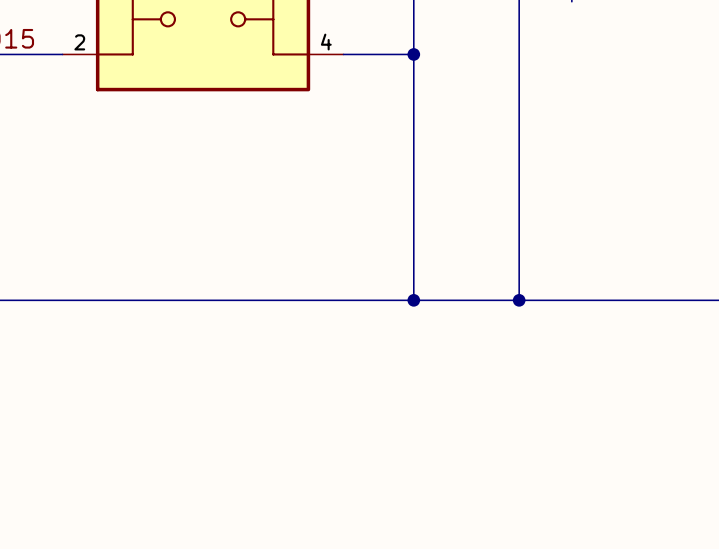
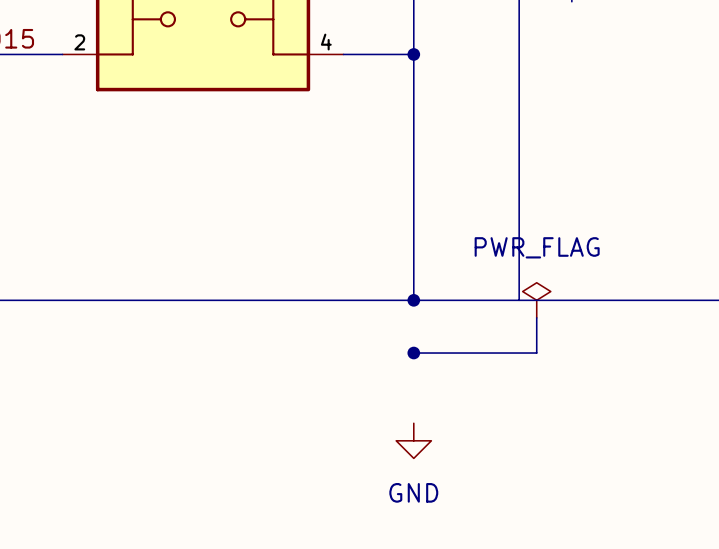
junction: (519, 300) -> none
power symbol: none -> PWR_FLAG (536, 300)
wire: none -> (536, 317) (536, 353) (413, 353)
junction: none -> (413, 353)
power symbol: none -> GND (413, 440)

